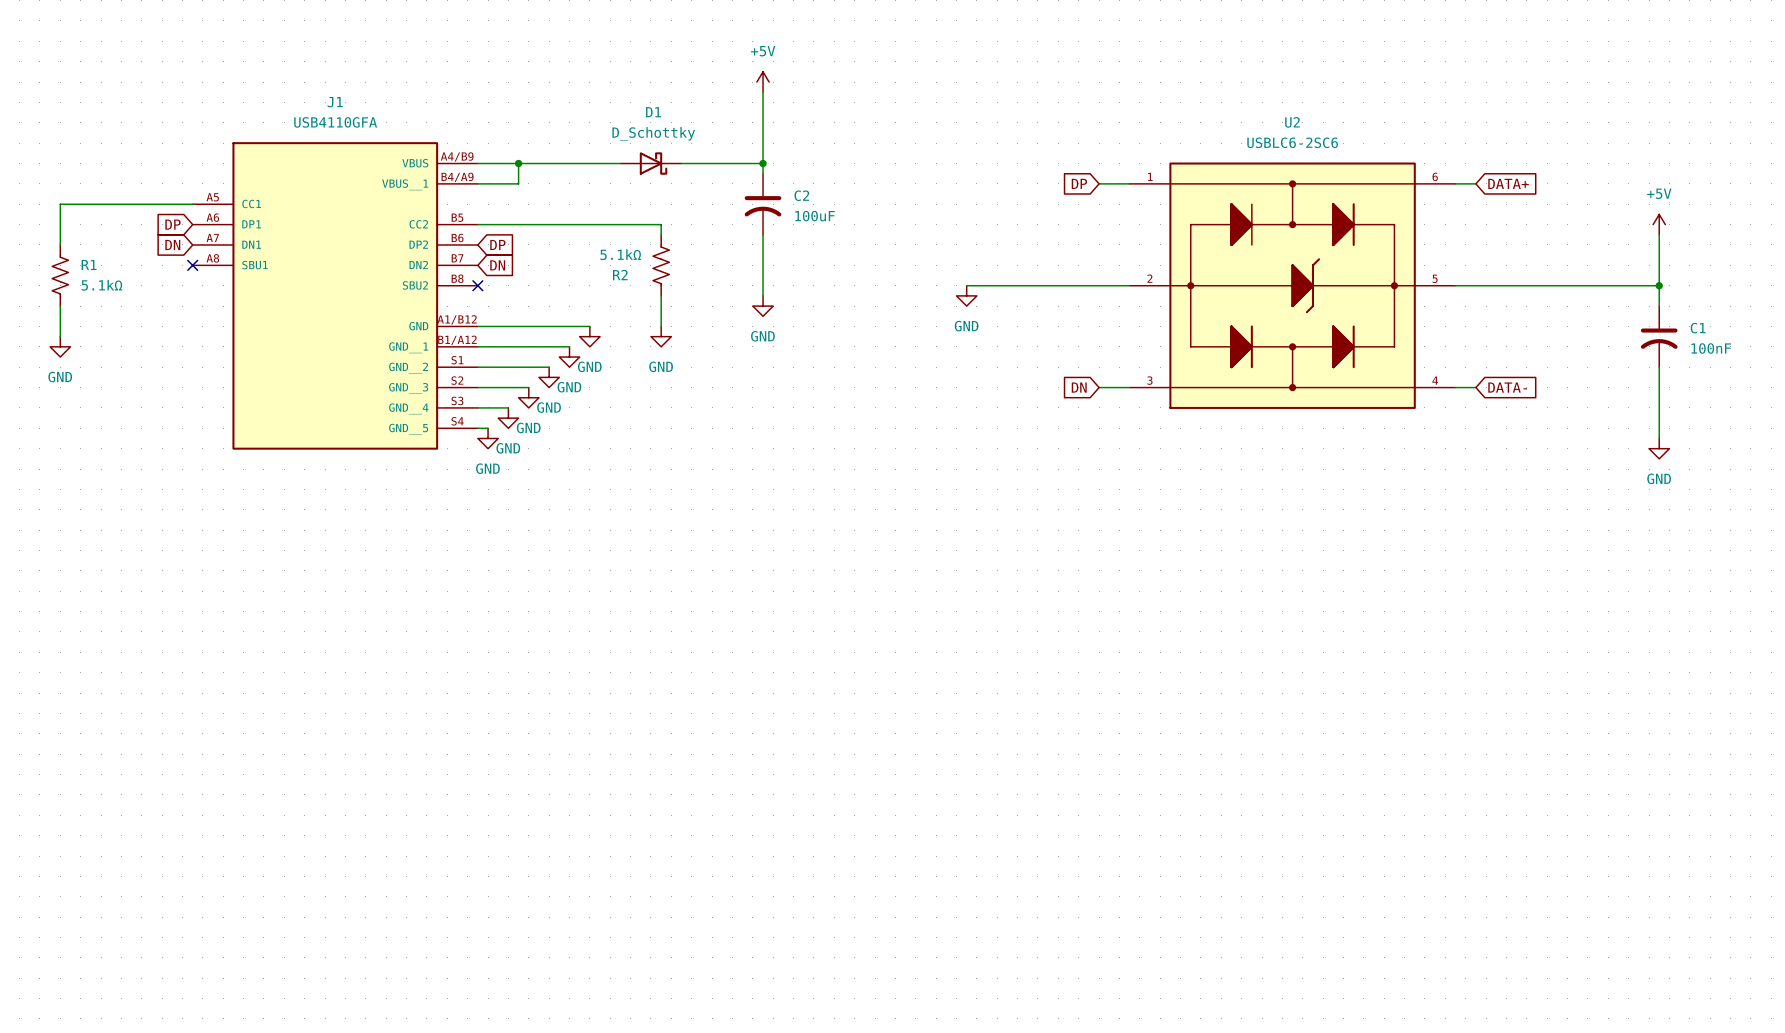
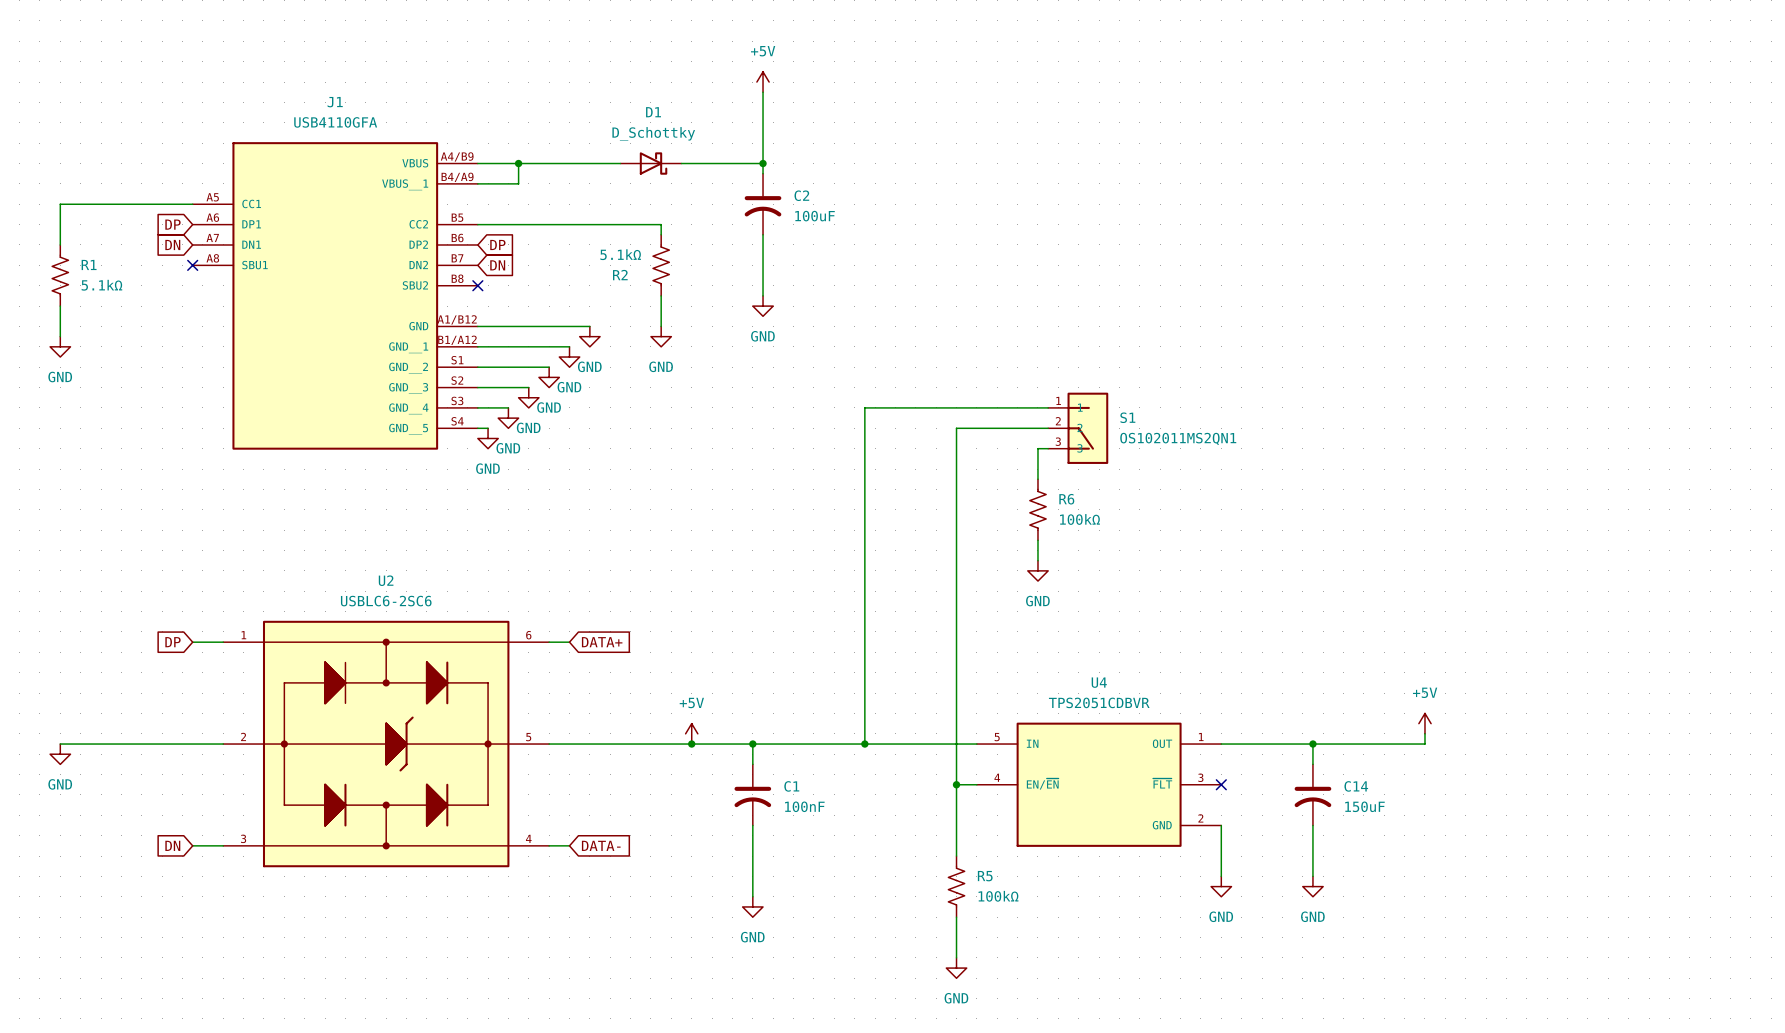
global label: DP (1079, 183) -> none
wire: (1099, 183) (1129, 183) -> none
wire: (1455, 183) (1475, 183) -> none
global label: DATA+ (1508, 183) -> none
power symbol: +5V (1659, 224) -> none
wire: (1659, 234) (1659, 306) -> none
wire: (966, 285) (1129, 285) -> none
U2 position: (1292, 285) -> (386, 744)
wire: (1455, 285) (1659, 285) -> none
junction: (1659, 285) -> none
power symbol: GND (966, 295) -> none
C1 position: (1659, 336) -> (752, 794)
wire: (1659, 367) (1659, 438) -> none
global label: DN (1079, 387) -> none
wire: (1099, 387) (1129, 387) -> none
wire: (1455, 387) (1475, 387) -> none
global label: DATA- (1507, 387) -> none
wire: none -> (1048, 407) (864, 407) (864, 744)
wire: none -> (1048, 428) (956, 428) (956, 856)
S1: none -> OS102011MS2QN1 (1078, 428)
wire: none -> (1048, 448) (1037, 448) (1037, 479)
power symbol: GND (1659, 448) -> none
R6: none -> 100kΩ (1037, 509)
wire: none -> (1037, 540) (1037, 560)
power symbol: none -> GND (1037, 570)
global label: none -> DP (172, 642)
wire: none -> (192, 642) (223, 642)
wire: none -> (549, 642) (569, 642)
global label: none -> DATA+ (602, 642)
power symbol: none -> +5V (1424, 723)
power symbol: none -> +5V (691, 733)
wire: none -> (1424, 733) (1424, 744) (1221, 744)
wire: none -> (60, 744) (223, 744)
wire: none -> (549, 744) (976, 744)
junction: none -> (691, 744)
wire: none -> (752, 744) (752, 764)
junction: none -> (752, 744)
junction: none -> (864, 744)
wire: none -> (1312, 744) (1312, 764)
junction: none -> (1312, 744)
power symbol: none -> GND (60, 754)
wire: none -> (956, 784) (976, 784)
junction: none -> (956, 784)
U4: none -> TPS2051CDBVR (1099, 784)
no-connect mark: none -> (1221, 784)
C14: none -> 150uF (1312, 794)
wire: none -> (752, 825) (752, 896)
wire: none -> (1221, 825) (1221, 876)
wire: none -> (1312, 825) (1312, 876)
global label: none -> DN (172, 845)
wire: none -> (192, 845) (223, 845)
wire: none -> (549, 845) (569, 845)
global label: none -> DATA- (601, 845)
R5: none -> 100kΩ (956, 886)
power symbol: none -> GND (1221, 886)
power symbol: none -> GND (1312, 886)
power symbol: none -> GND (752, 906)
wire: none -> (956, 917) (956, 957)
power symbol: none -> GND (956, 968)

